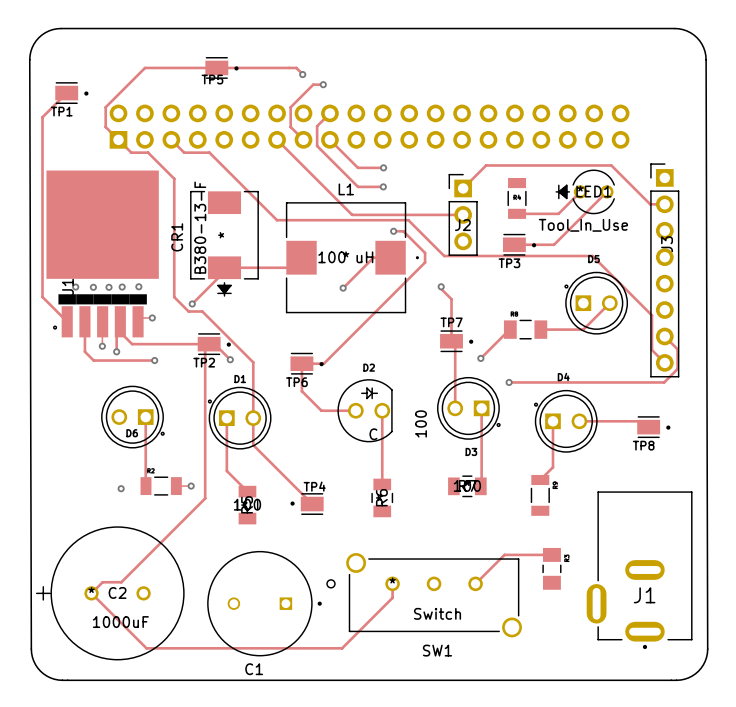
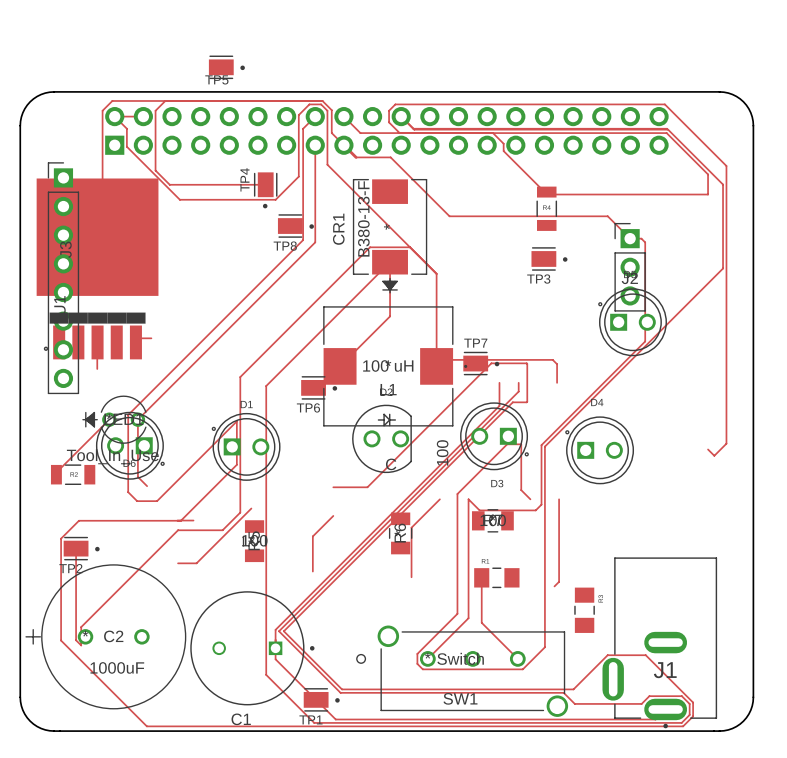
track: (302, 74) (296, 67) (145, 67) (105, 107) (105, 127) (131, 152) (148, 152) (174, 178) (174, 297) (188, 311) (202, 311) (253, 362) (253, 445) (312, 504) -> none
via: (302, 74) -> none
track: (323, 84) (313, 84) (290, 107) (290, 127) (303, 139) -> (147, 486) (137, 476) (137, 419) (315, 242) (315, 145)
via: (323, 84) -> none
track: (66, 93) (42, 117) (42, 297) (67, 321) -> none
TP1 position: (71, 93) -> (321, 699)
track: none -> (165, 100) (155, 110) (155, 170) (169, 184) (265, 184)
track: none -> (143, 116) (114, 116) (126, 128) (126, 146) (179, 199) (275, 199) (298, 176) (298, 115) (309, 104) (321, 104) (327, 110) (327, 164) (436, 273) (436, 366) (443, 359) (552, 359) (557, 364) (557, 382)
track: none -> (315, 116) (303, 128) (303, 240) (128, 415) (128, 492) (137, 501) (157, 501) (236, 421) (236, 464) (180, 520) (78, 520) (61, 538) (61, 640) (146, 726) (683, 726) (693, 716) (693, 702) (645, 655) (607, 655) (573, 689) (342, 689) (283, 631) (512, 402) (527, 401) (526, 363) (491, 363) (367, 487) (333, 487)
track: (329, 113) (317, 126) (317, 145) (358, 186) (383, 186) -> (343, 116) (360, 133) (666, 133) (708, 174) (708, 194) (547, 194) (503, 151) (503, 143) (493, 133)
track: none -> (401, 116) (414, 129) (668, 129) (723, 184) (723, 268) (544, 446) (544, 647) (522, 669) (422, 669) (417, 663) (417, 653) (457, 613) (457, 494) (507, 444) (521, 444) (521, 490) (530, 499)
track: none -> (413, 128) (667, 128)
track: none -> (399, 133) (389, 122) (389, 110) (395, 104) (664, 104) (726, 166) (726, 443) (714, 455) (708, 449)
track: (171, 139) (184, 152) (209, 152) (277, 220) (408, 220) (444, 256) (592, 256) (651, 315) (651, 350) (664, 362) -> none
track: (277, 139) (352, 214) (463, 214) -> none
track: none -> (343, 145) (331, 133) (331, 110) (322, 100) (112, 100) (102, 110) (102, 202) (115, 214)
track: (341, 151) (357, 167) (383, 167) -> (356, 157) (390, 157) (449, 216) (607, 216) (630, 238) (641, 238) (645, 242) (645, 341) (541, 445) (541, 504) (535, 510) (479, 510) (468, 499) (468, 618) (427, 658)
via: (383, 167) -> none
via: (383, 186) -> none
track: (463, 188) (486, 165) (611, 165) (650, 204) (664, 204) -> none
L1 name position: L1 (346, 189) -> L1 (388, 389)
track: (580, 191) (558, 213) (517, 213) -> none
LED1 position: (585, 191) -> (114, 419)
track: (606, 191) (554, 244) (514, 244) -> none
J2 position: (463, 214) -> (630, 267)
track: (393, 231) (403, 231) (425, 252) (425, 262) (323, 363) (301, 363) (301, 391) (321, 410) (355, 410) -> none
via: (393, 231) -> none
track: none -> (410, 247) (370, 247) (240, 377) (240, 512) (222, 530) (178, 530) (81, 627) (81, 645) (76, 640) (76, 548)
CR1 position: (224, 243) -> (390, 236)
track: (301, 257) (291, 267) (224, 267) (224, 271) (192, 303) -> none
L1 position: (352, 257) -> (395, 366)
track: (390, 257) (373, 257) (343, 288) -> none
J3 position: (664, 270) -> (63, 278)
via: (138, 286) -> none
track: (441, 286) (451, 299) (451, 341) (455, 344) (455, 408) -> none
via: (441, 286) -> none
via: (75, 287) -> none
via: (93, 287) -> none
via: (108, 287) -> none
via: (122, 287) -> none
via: (343, 288) -> none
via: (192, 303) -> none
track: (609, 303) (583, 329) (540, 329) -> none
via: (152, 317) -> none
track: (84, 321) (84, 351) (93, 360) (154, 360) -> none
track: (510, 329) (480, 358) -> none
part: (525, 329) -> none
track: (664, 336) (677, 349) (677, 369) (664, 382) (509, 382) -> none
track: none -> (340, 366) (390, 316) (390, 262) (266, 386) (266, 674) (314, 722) (681, 722) (689, 714) (689, 703) (681, 696) (649, 696) (641, 703) (574, 703) (563, 692) (340, 692) (279, 631) (518, 391) (518, 382)
track: (209, 344) (205, 348) (205, 498) (121, 582) (102, 582) (91, 593) (146, 648) (342, 648) (392, 597) (392, 583) -> none
TP2 position: (214, 344) -> (81, 548)
via: (102, 346) -> none
track: (116, 351) (116, 325) (120, 321) (120, 332) (132, 344) (214, 344) (230, 359) -> none
via: (116, 351) -> none
via: (480, 358) -> none
via: (230, 359) -> none
track: none -> (499, 382) (499, 405) (275, 629) (275, 659) (335, 719) (655, 719) (665, 709)
via: (154, 360) -> none
via: (509, 382) -> none
track: none -> (109, 419) (56, 474)
track: (481, 408) (480, 486) -> none
track: (382, 410) (382, 484) -> none
track: (145, 417) (146, 486) -> none
track: (226, 418) (226, 471) (247, 491) -> none
track: (553, 421) (553, 467) (540, 479) -> none
track: (579, 421) (642, 421) (648, 427) -> none
TP8 position: (653, 427) -> (295, 226)
track: none -> (439, 499) (411, 527) (411, 577)
track: none -> (559, 499) (559, 581) (554, 586)
track: none -> (251, 508) (196, 563) (178, 563)
part footprint: [140, 476, 182, 496] -> [50, 464, 96, 486]
track: none -> (333, 515) (312, 536) (312, 571)
via: (191, 486) -> none
via: (121, 488) -> none
part: (540, 495) -> none
TP4 rotation: 0° (307, 504) -> 90° counterclockwise (265, 190)
TP4 position: (307, 504) -> (265, 190)
track: none -> (481, 577) (481, 622) (517, 658)
part: none -> (496, 577)
track: (551, 554) (504, 554) (475, 583) -> none
J1 position: (639, 570) -> (659, 642)
SW1 position: (424, 595) -> (462, 671)
C1 position: (264, 603) -> (252, 648)
board edge: (31, 649) (29, 59) (32, 47) (38, 37) (49, 30) (60, 28) (674, 28) (686, 30) (696, 37) (703, 47) (706, 59) (707, 649) -> (20, 697) (20, 125) (22, 112) (30, 101) (41, 94) (54, 91) (719, 91) (728, 93) (740, 98) (750, 112) (753, 125) (753, 697)

